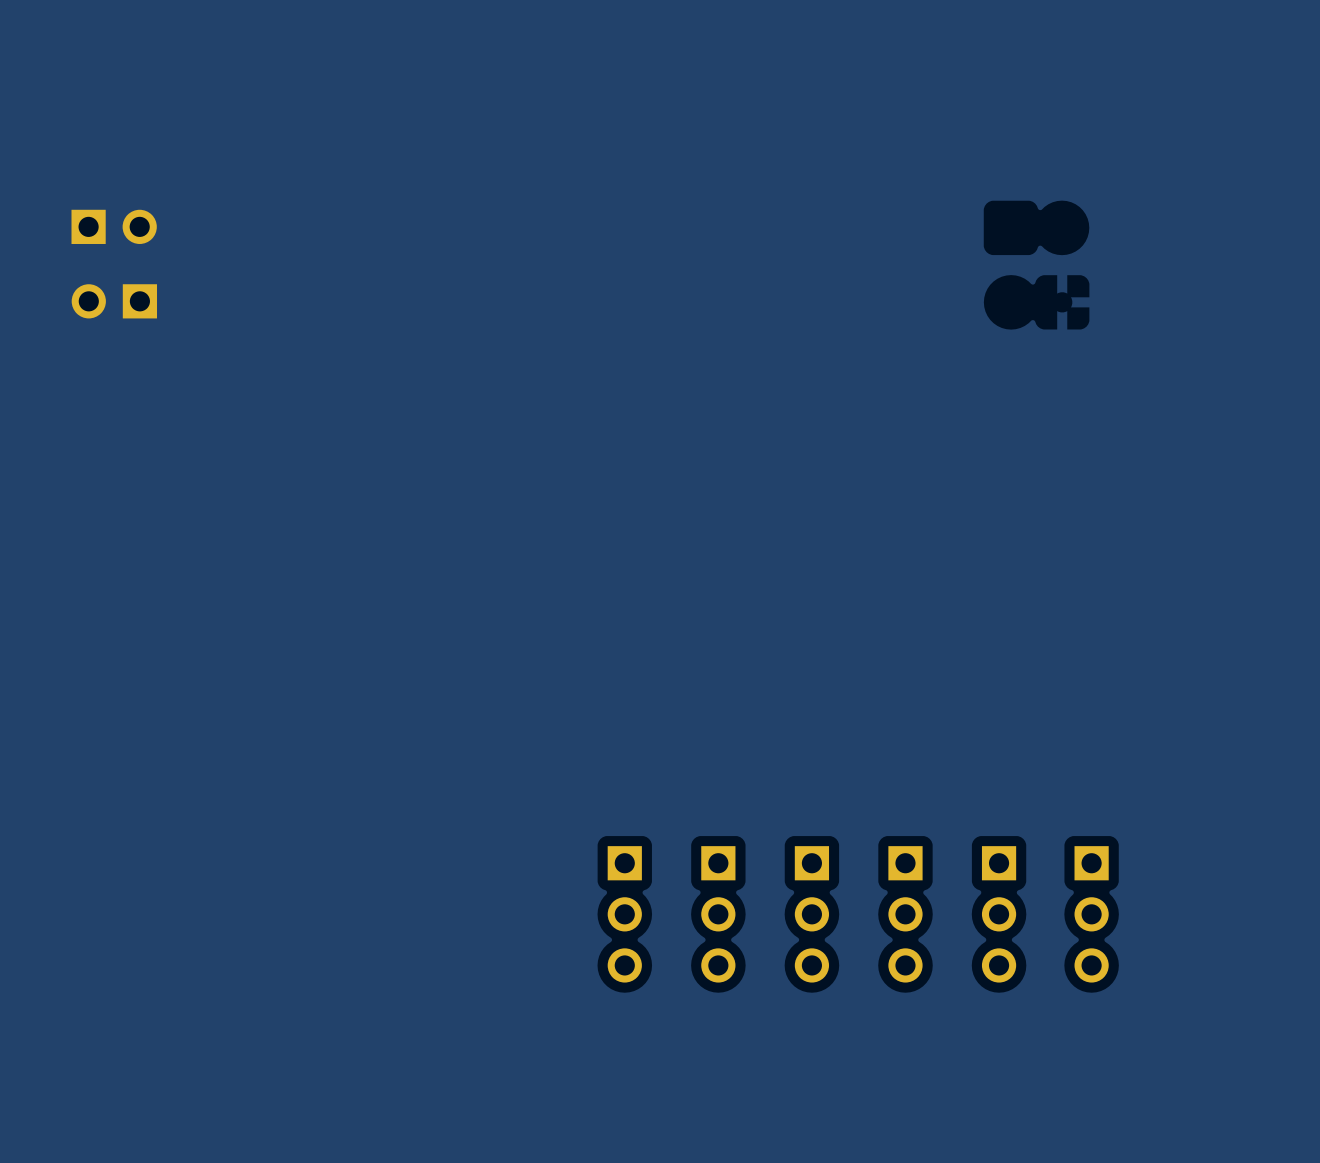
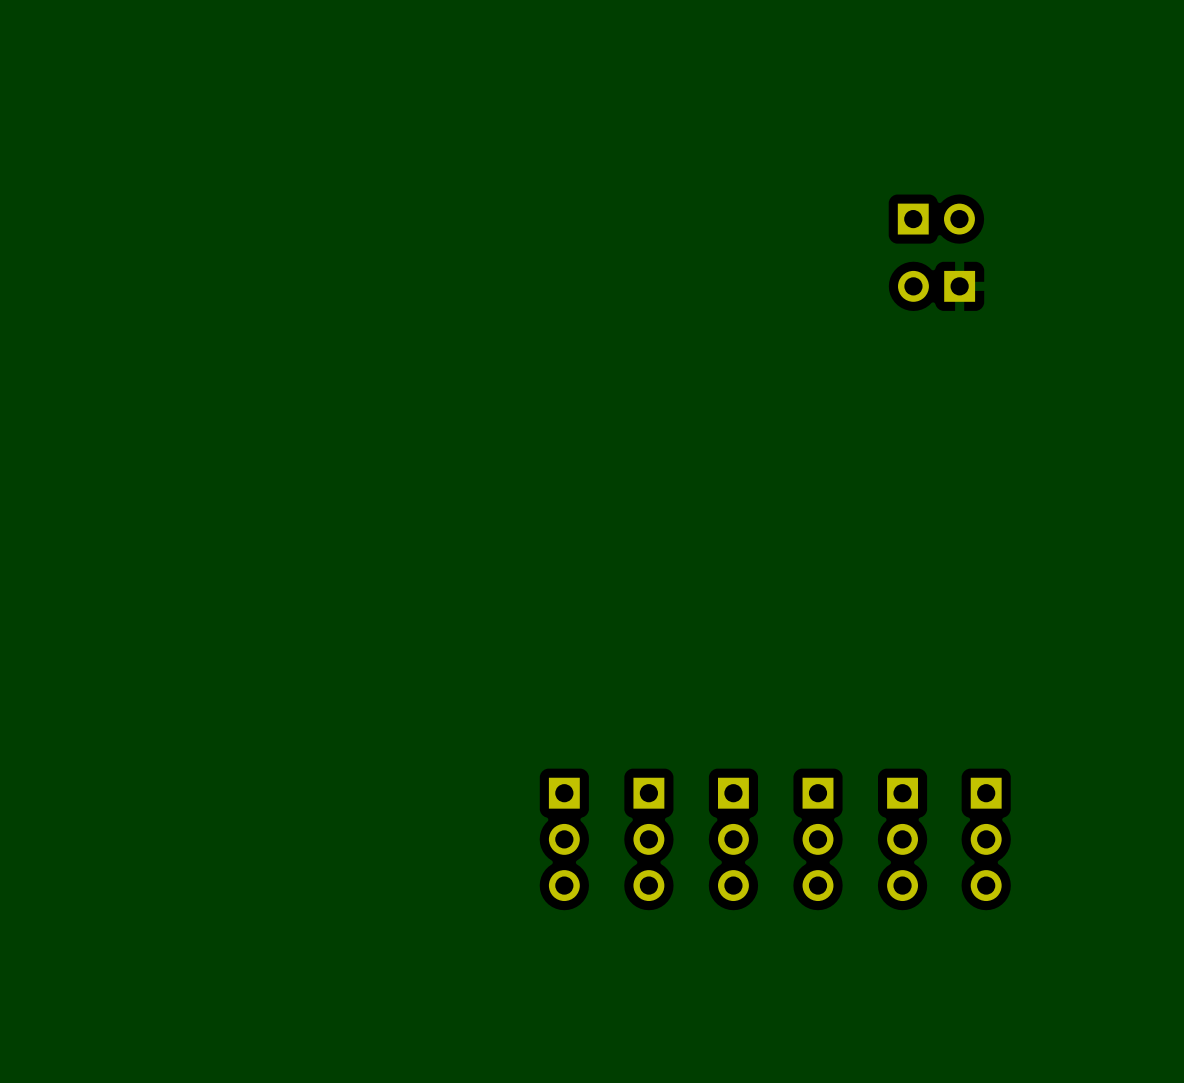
part: (114, 226) -> none
part: none -> (936, 219)
part: (114, 301) -> none
part: none -> (936, 286)

